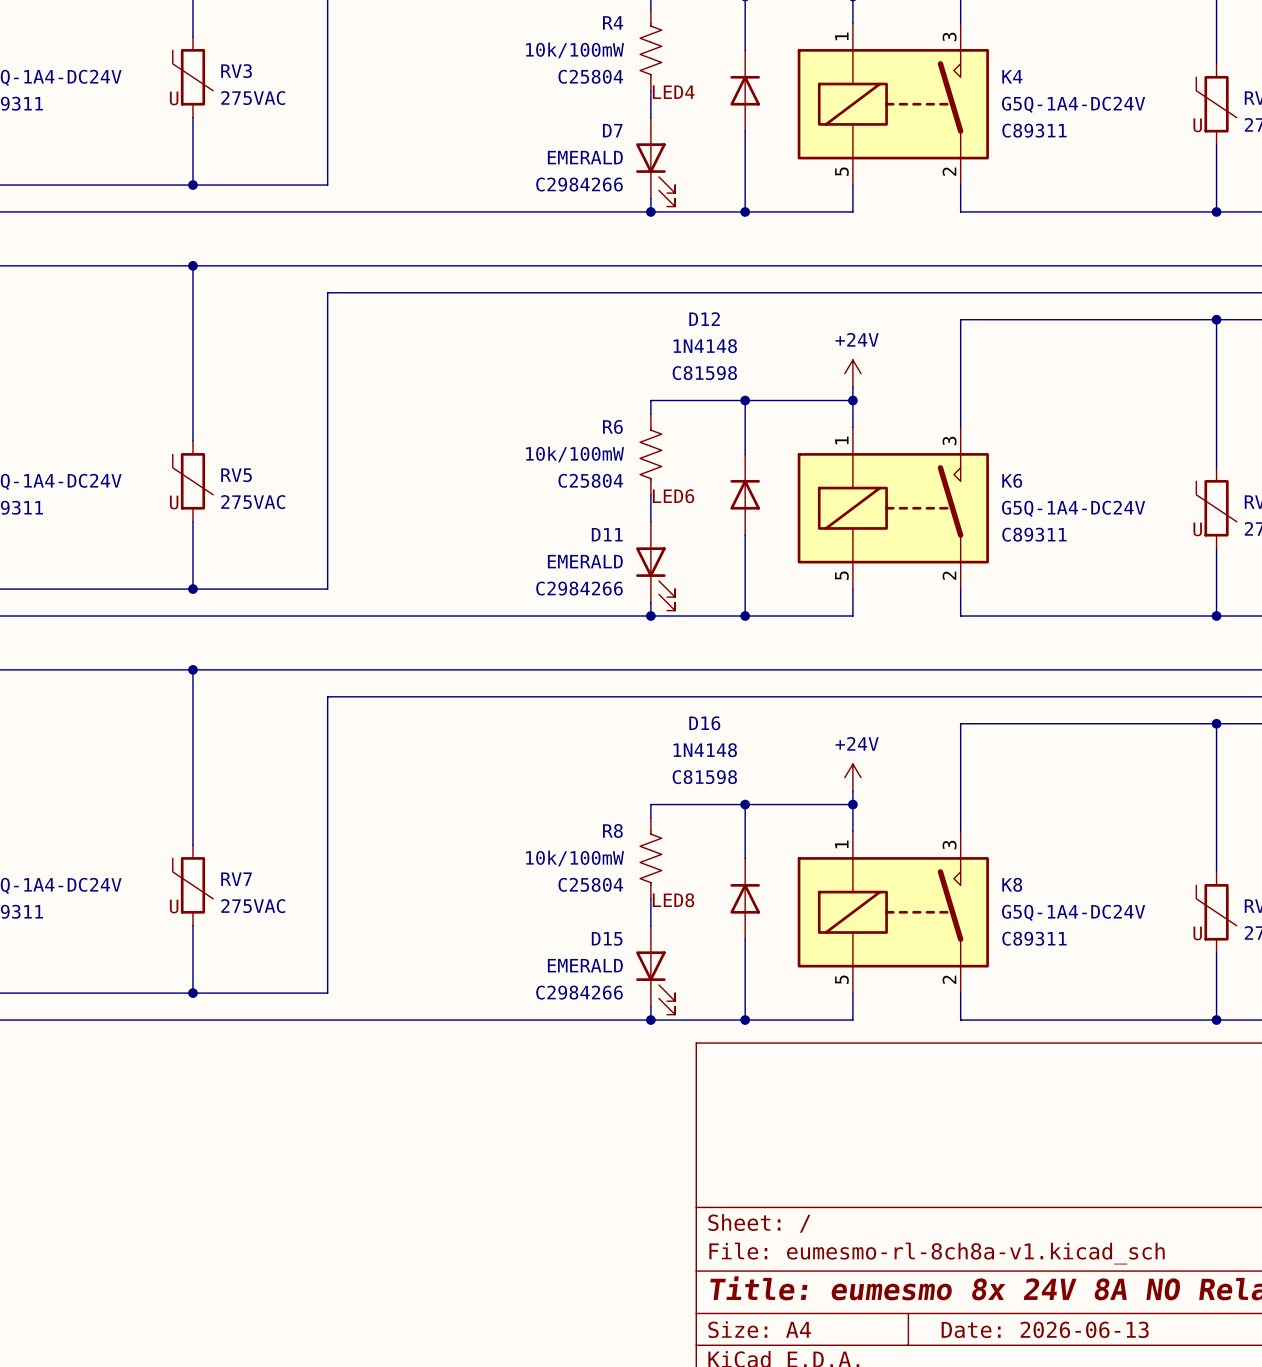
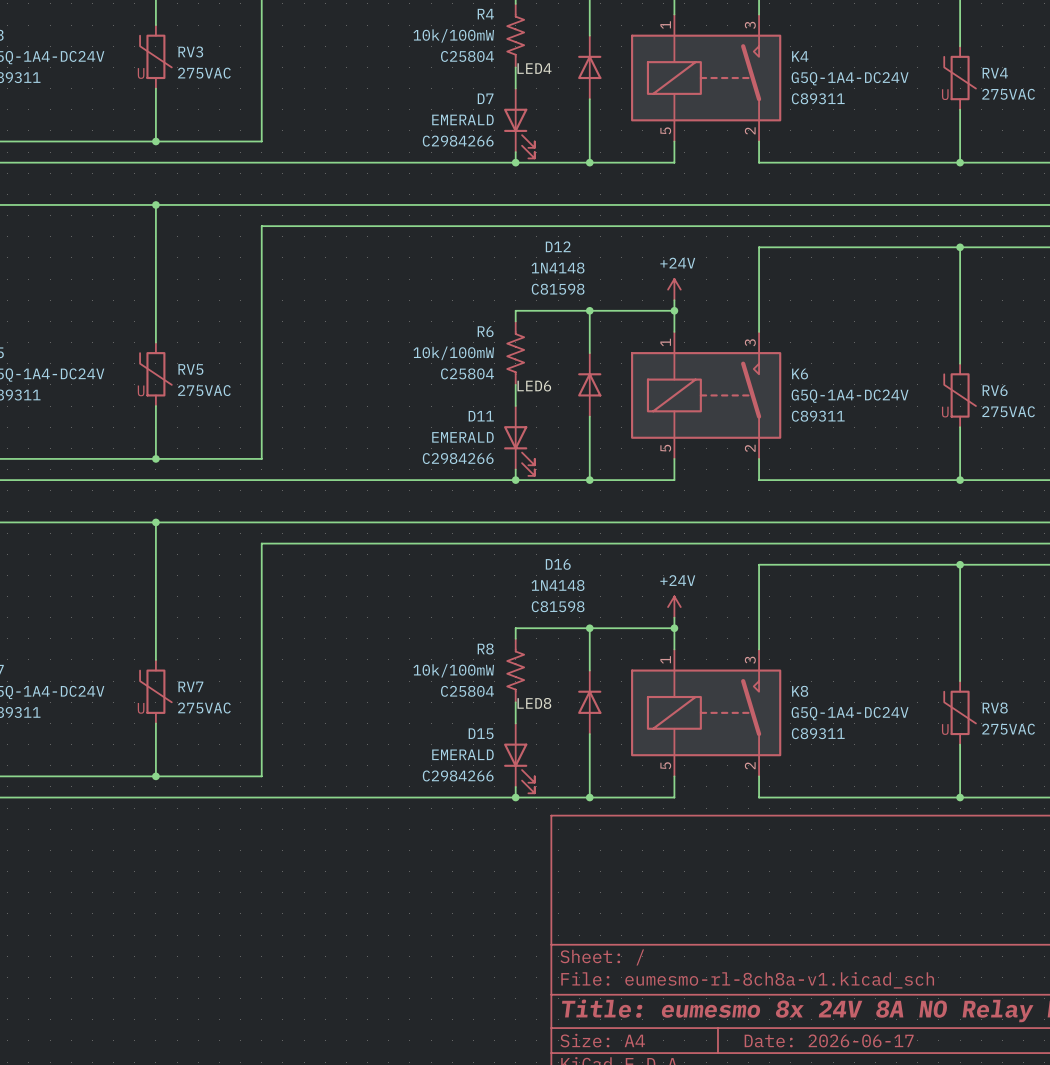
title block: Date: 2026-06-13 (1045, 1329) -> Date: 2026-06-17 (829, 1040)

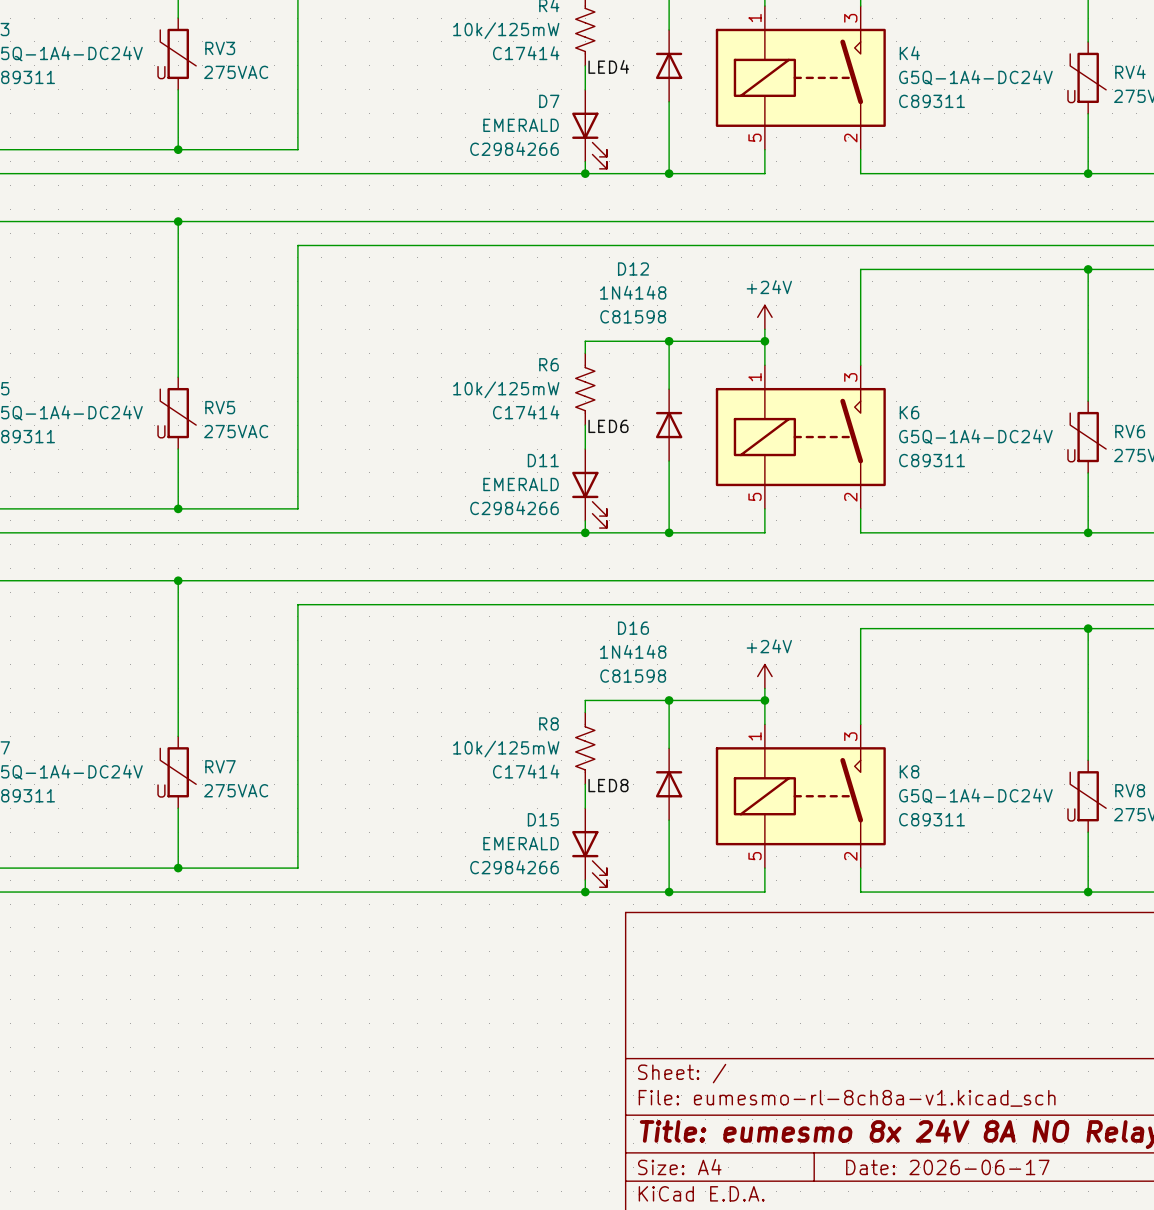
R4 value: 10k/100mW (453, 35) -> 10k/125mW (506, 30)
R4 text: C25804 (467, 56) -> C17414 (526, 53)
R6 value: 10k/100mW (453, 353) -> 10k/125mW (506, 389)
R6 text: C25804 (467, 373) -> C17414 (526, 412)
R8 value: 10k/100mW (453, 670) -> 10k/125mW (506, 749)
R8 text: C25804 (467, 691) -> C17414 (526, 771)

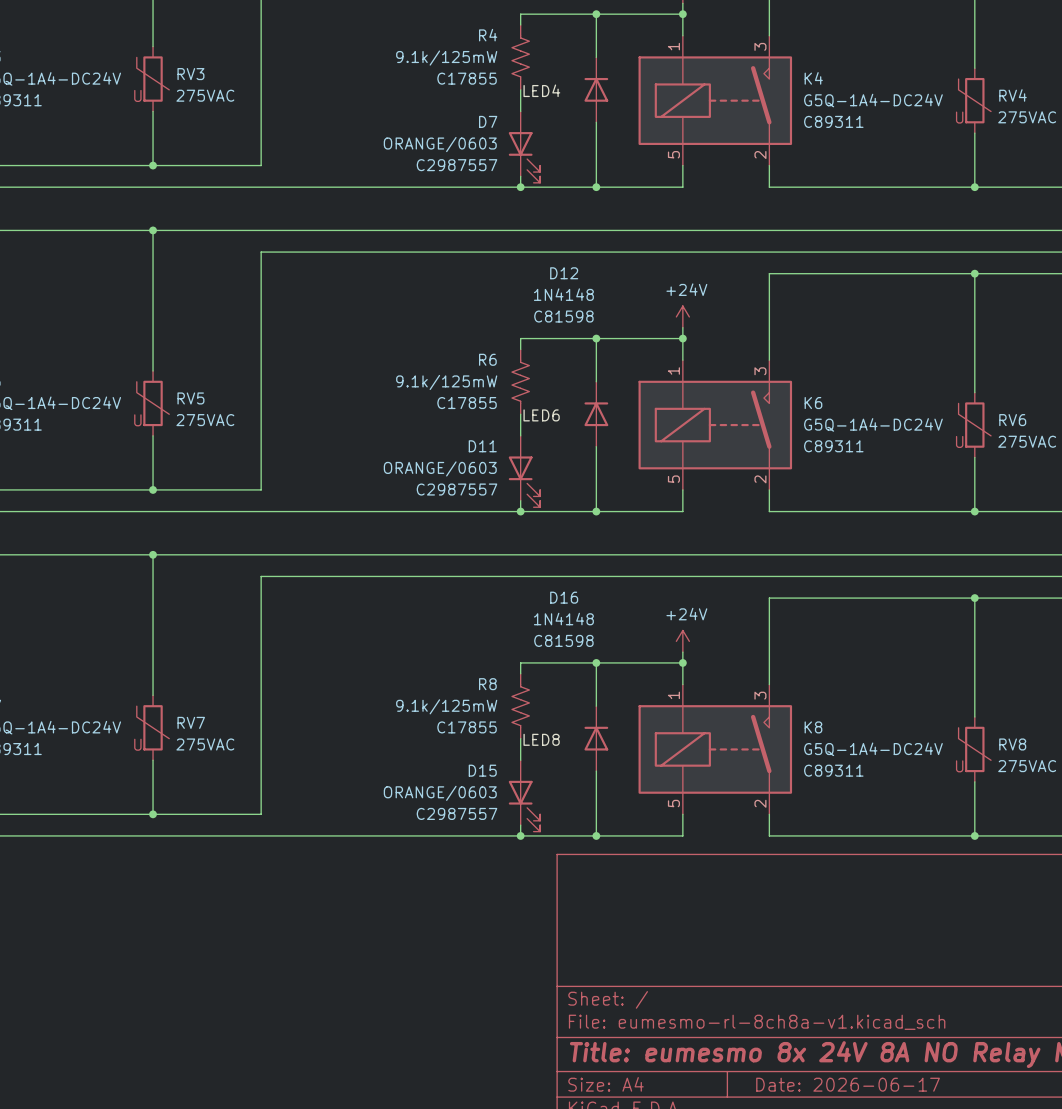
R4 value: 10k/125mW (506, 30) -> 9.1k/125mW (446, 58)
R4 text: C17414 (526, 53) -> C17855 (467, 78)
D7 value: EMERALD (521, 125) -> ORANGE/0603 (440, 144)
D7 text: C2984266 (514, 148) -> C2987557 (456, 165)
R6 value: 10k/125mW (506, 389) -> 9.1k/125mW (446, 382)
R6 text: C17414 (526, 412) -> C17855 (467, 403)
D11 value: EMERALD (521, 484) -> ORANGE/0603 (440, 468)
D11 text: C2984266 (514, 508) -> C2987557 (456, 489)
R8 value: 10k/125mW (506, 749) -> 9.1k/125mW (446, 706)
R8 text: C17414 (526, 771) -> C17855 (467, 727)
D15 value: EMERALD (521, 843) -> ORANGE/0603 (440, 793)
D15 text: C2984266 (514, 867) -> C2987557 (456, 813)

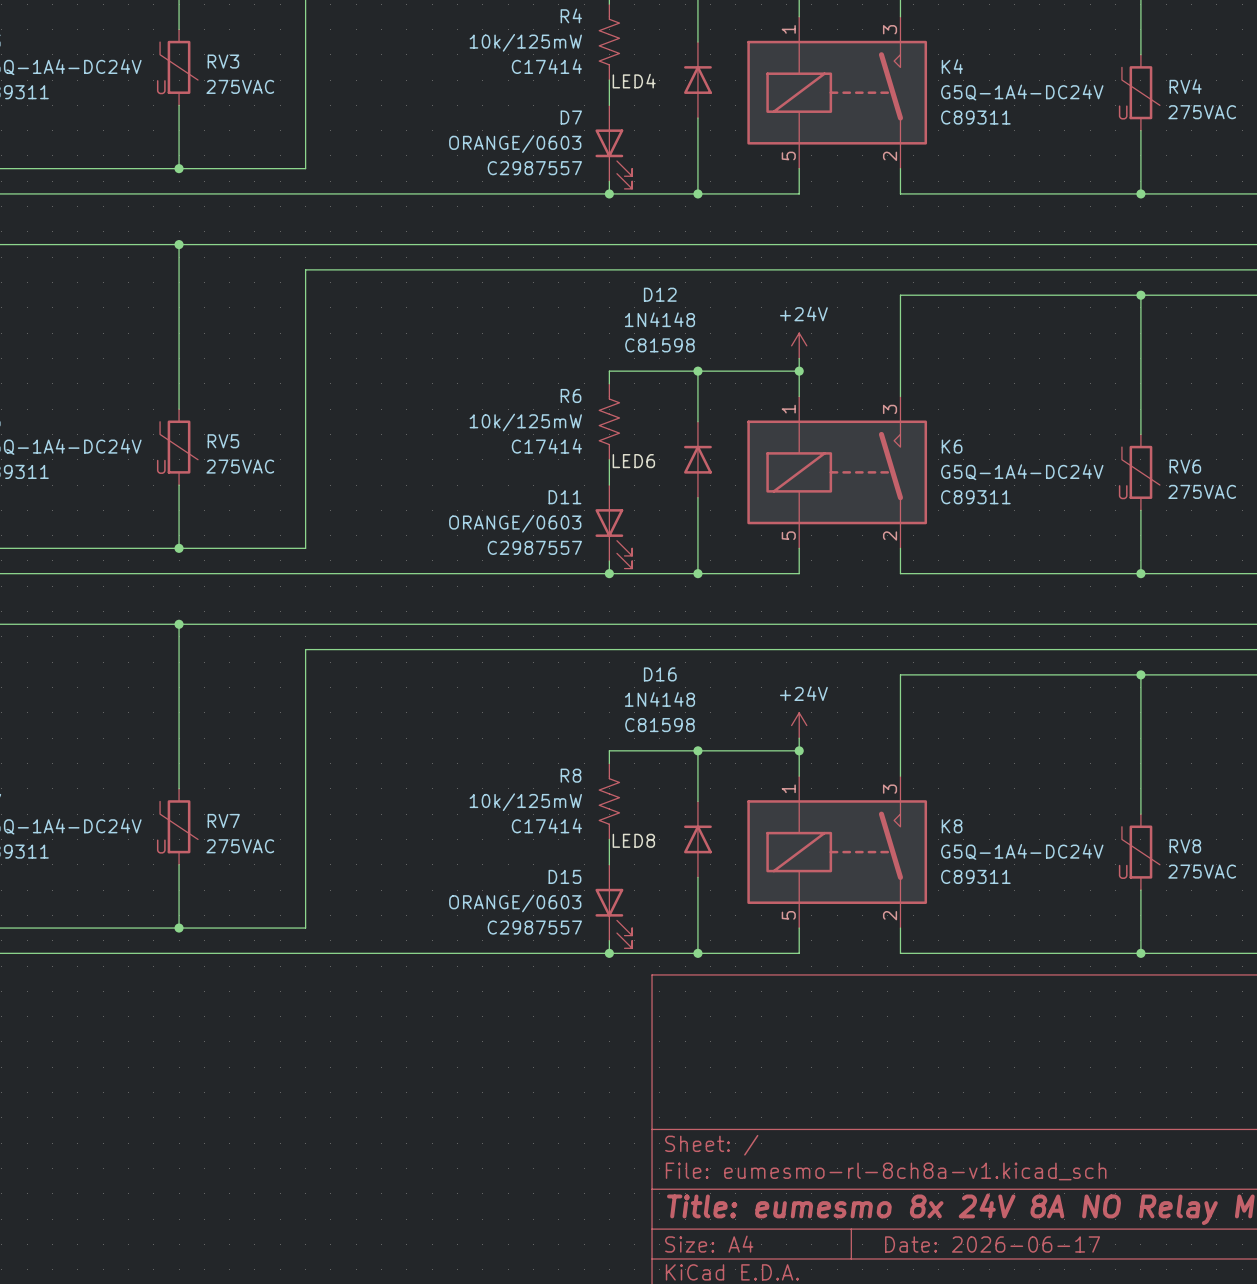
R4 value: 9.1k/125mW (446, 58) -> 10k/125mW (525, 42)
R4 text: C17855 (467, 78) -> C17414 (546, 66)
R6 value: 9.1k/125mW (446, 382) -> 10k/125mW (525, 422)
R6 text: C17855 (467, 403) -> C17414 (546, 446)
R8 value: 9.1k/125mW (446, 706) -> 10k/125mW (525, 802)
R8 text: C17855 (467, 727) -> C17414 (546, 826)

